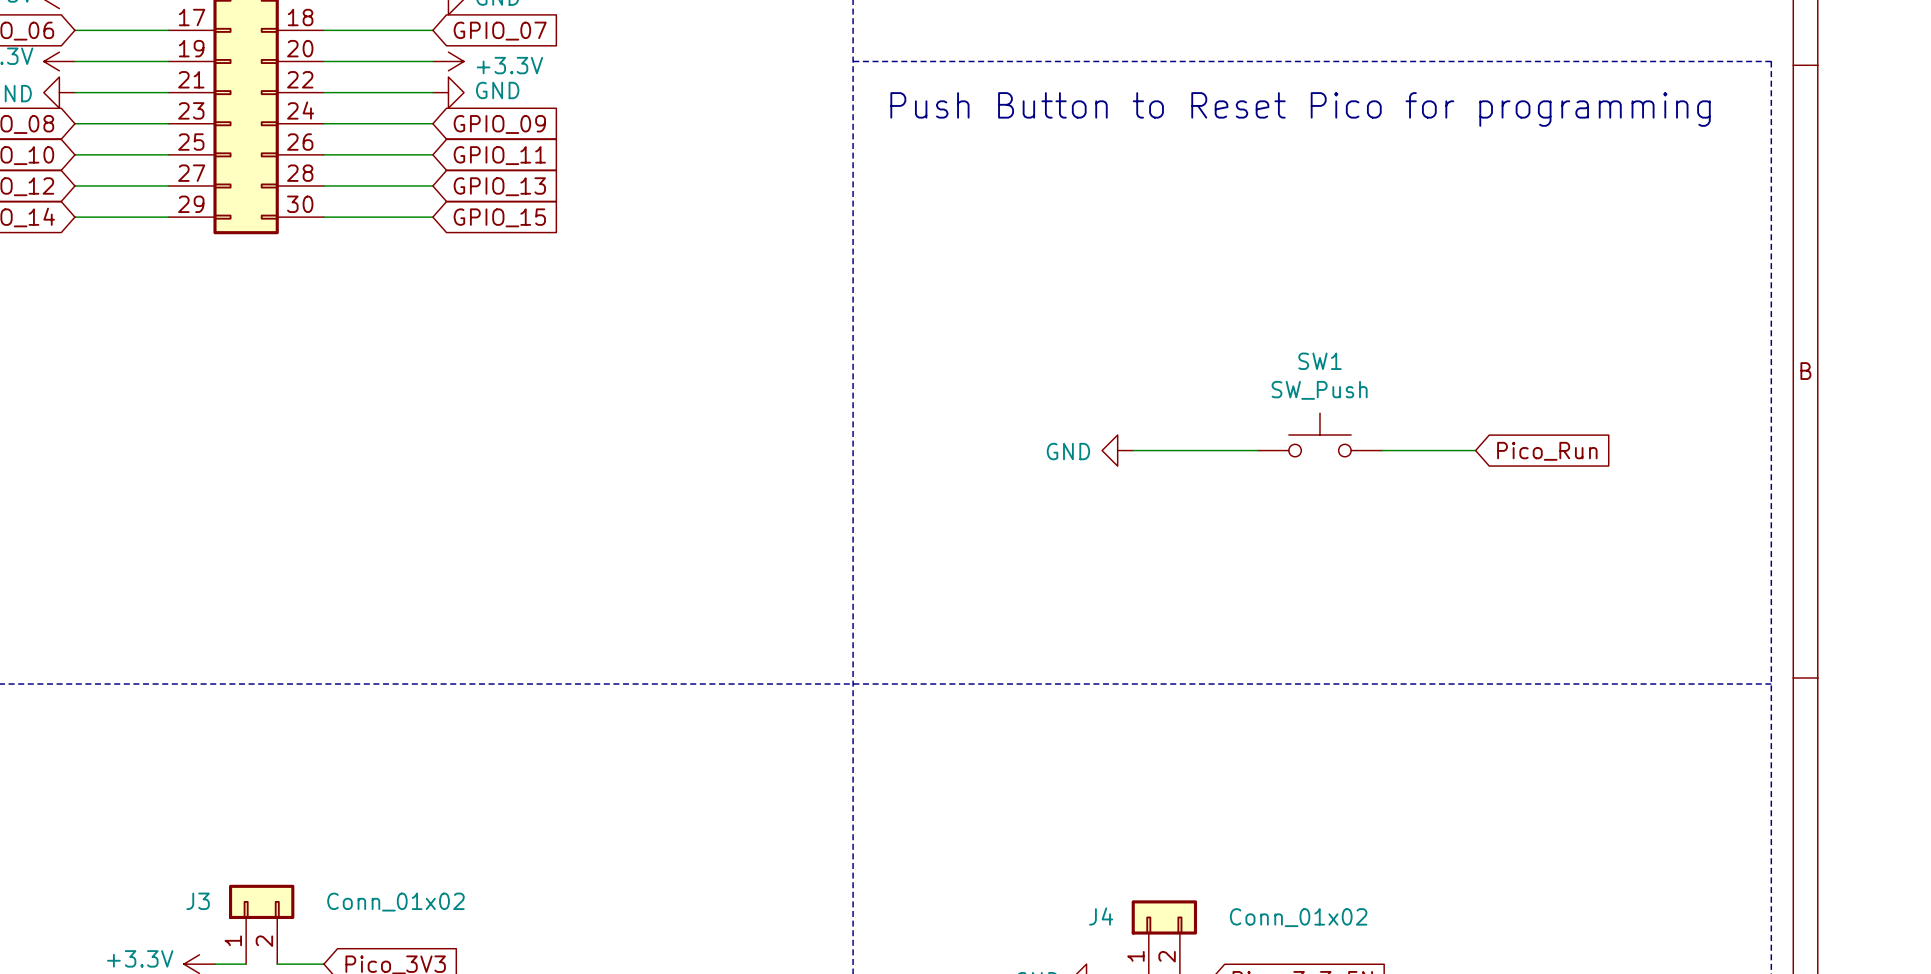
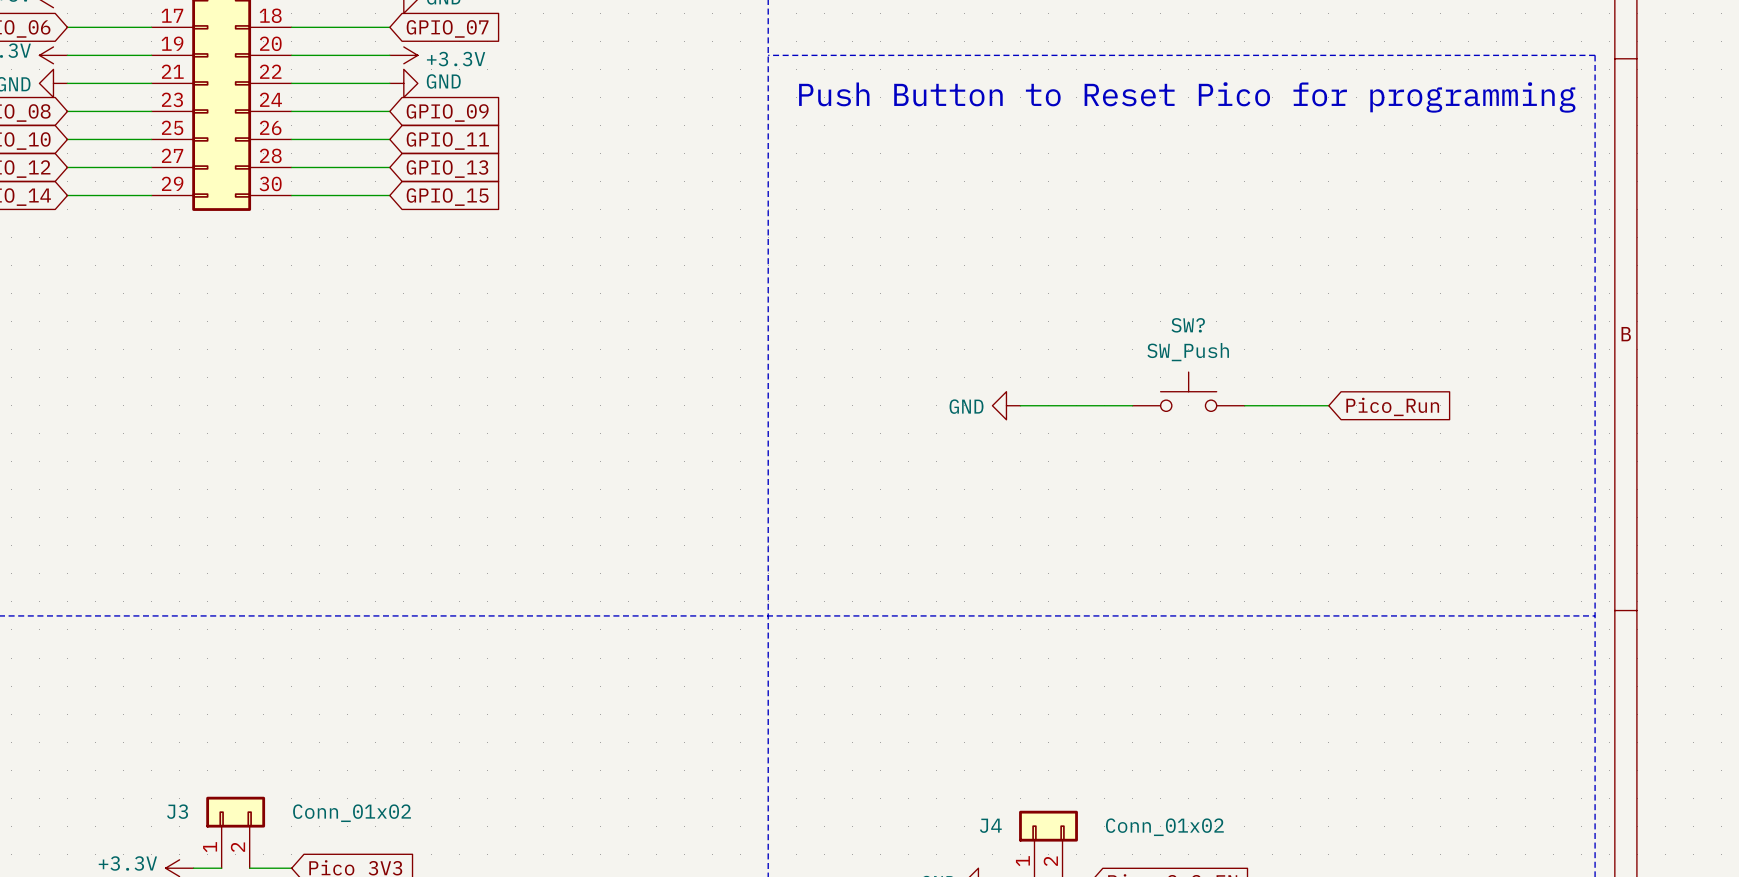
SW1 name: SW1 (1319, 361) -> SW? (1188, 325)

